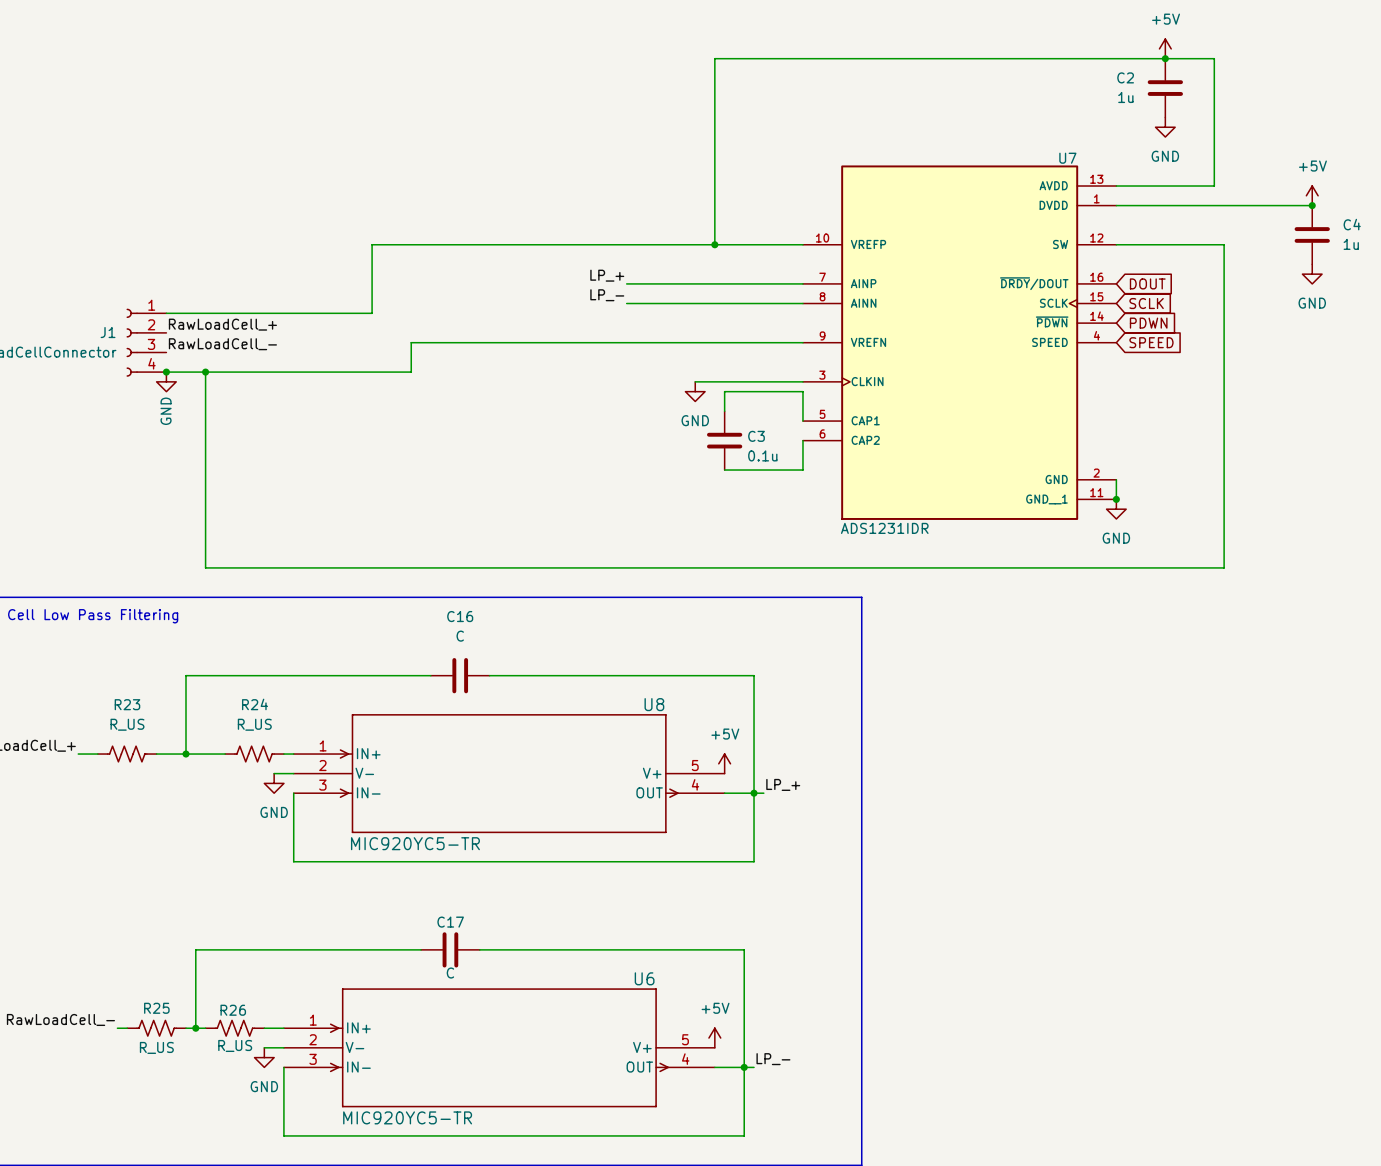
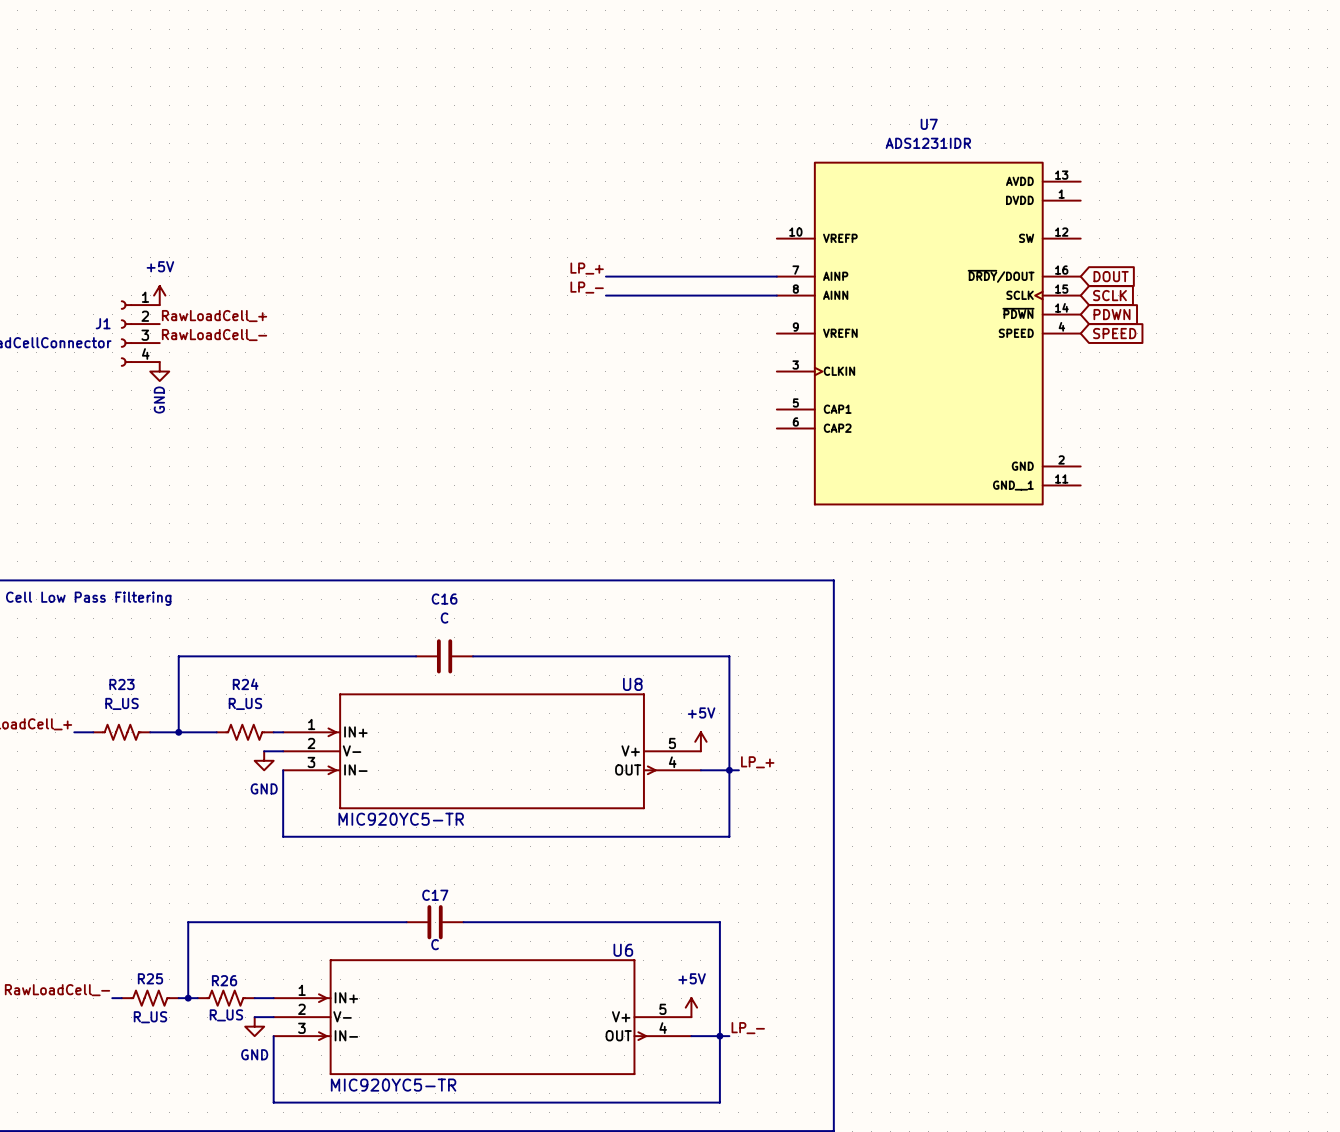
power symbol: +5V (1165, 48) -> none
junction: (1165, 58) -> none
C2: 1u (1165, 88) -> none
power symbol: GND (1165, 127) -> none
U7 name position: U7 (1067, 158) -> U7 (929, 124)
wire: (1116, 186) (1214, 186) (1214, 58) (714, 58) (714, 244) -> none
power symbol: +5V (1312, 195) -> none
wire: (1116, 205) (1312, 205) -> none
junction: (1312, 205) -> none
C4: 1u (1312, 234) -> none
junction: (714, 244) -> none
wire: (802, 244) (372, 244) (372, 313) (166, 313) -> none
wire: (1116, 244) (1224, 244) (1224, 567) (205, 567) (205, 372) -> none
power symbol: GND (1312, 274) -> none
power symbol: none -> +5V (159, 295)
wire: (802, 342) (411, 342) (411, 372) (166, 372) -> none
junction: (166, 372) -> none
junction: (205, 372) -> none
wire: (695, 381) (802, 381) -> none
power symbol: GND (695, 391) -> none
wire: (724, 411) (724, 391) (802, 391) (802, 421) -> none
C3: 0.1u (724, 440) -> none
wire: (802, 440) (802, 470) (724, 470) -> none
wire: (1116, 479) (1116, 499) -> none
junction: (1116, 499) -> none
power symbol: GND (1116, 509) -> none
U7 value position: ADS1231IDR (884, 528) -> ADS1231IDR (928, 143)

